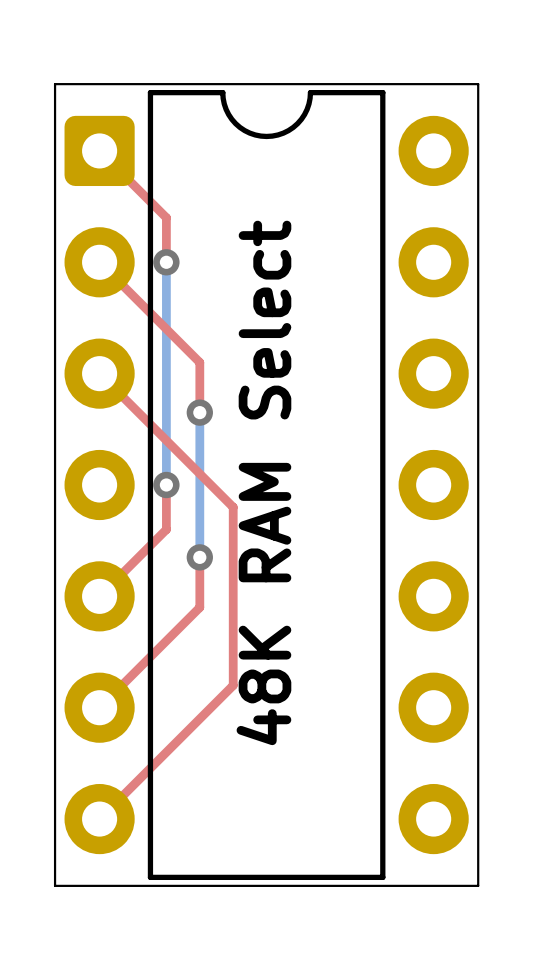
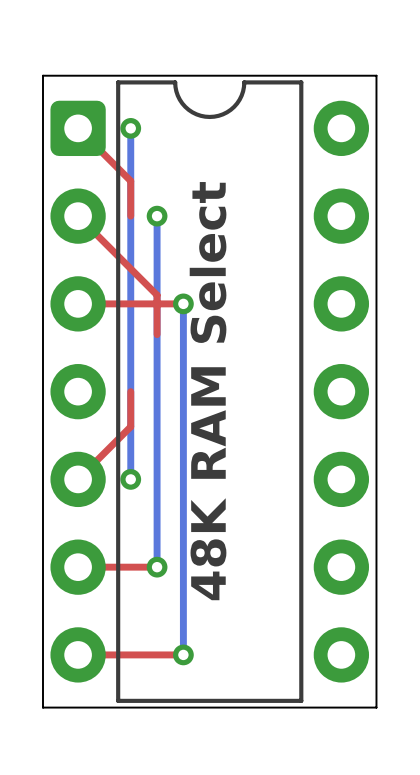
bottom track: none -> (130, 128) (130, 216)
via: none -> (130, 128)
via position: (166, 262) -> (157, 216)
bottom track: none -> (157, 216) (157, 334)
top track: (99, 373) (233, 507) (233, 685) (99, 819) -> (78, 303) (183, 303)
bottom track: none -> (183, 303) (183, 654)
via position: (199, 412) -> (183, 303)
bottom track: none -> (130, 391) (130, 479)
via: (166, 485) -> none
top track: (199, 557) (199, 607) (99, 707) -> (157, 567) (78, 567)
bottom track: none -> (157, 448) (157, 567)
via position: (199, 557) -> (130, 479)
via: none -> (157, 567)
top track: none -> (78, 654) (183, 654)
via: none -> (183, 654)

